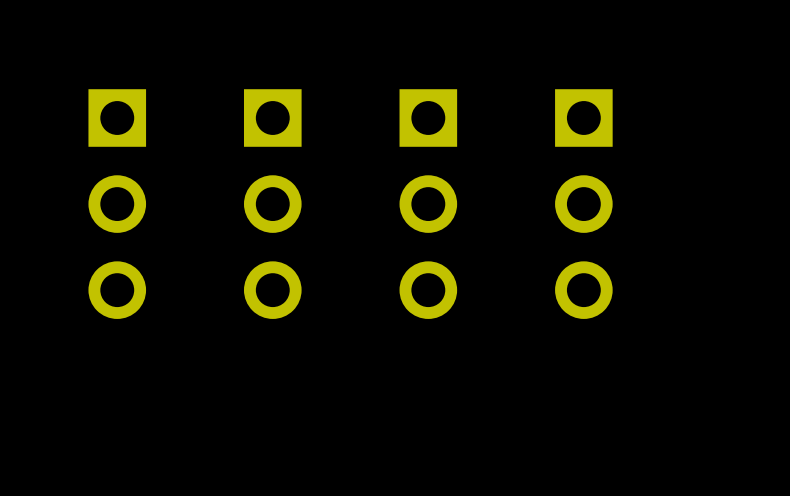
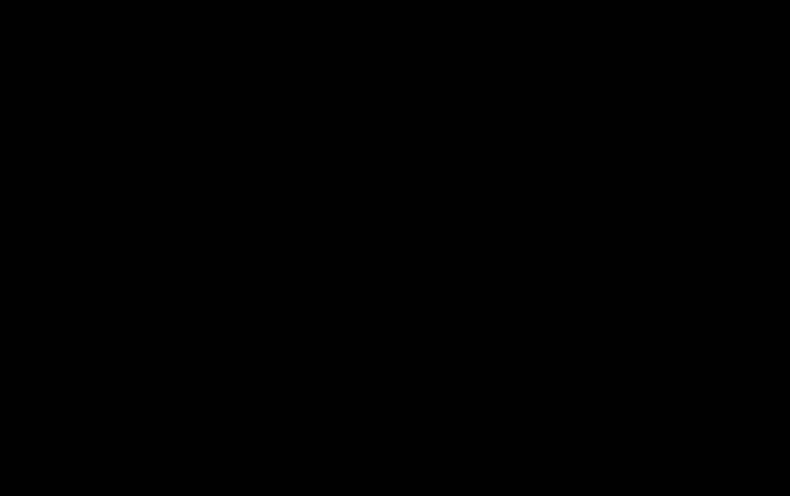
part: (117, 204) -> none
part: (272, 204) -> none
part: (428, 204) -> none
part: (583, 204) -> none

